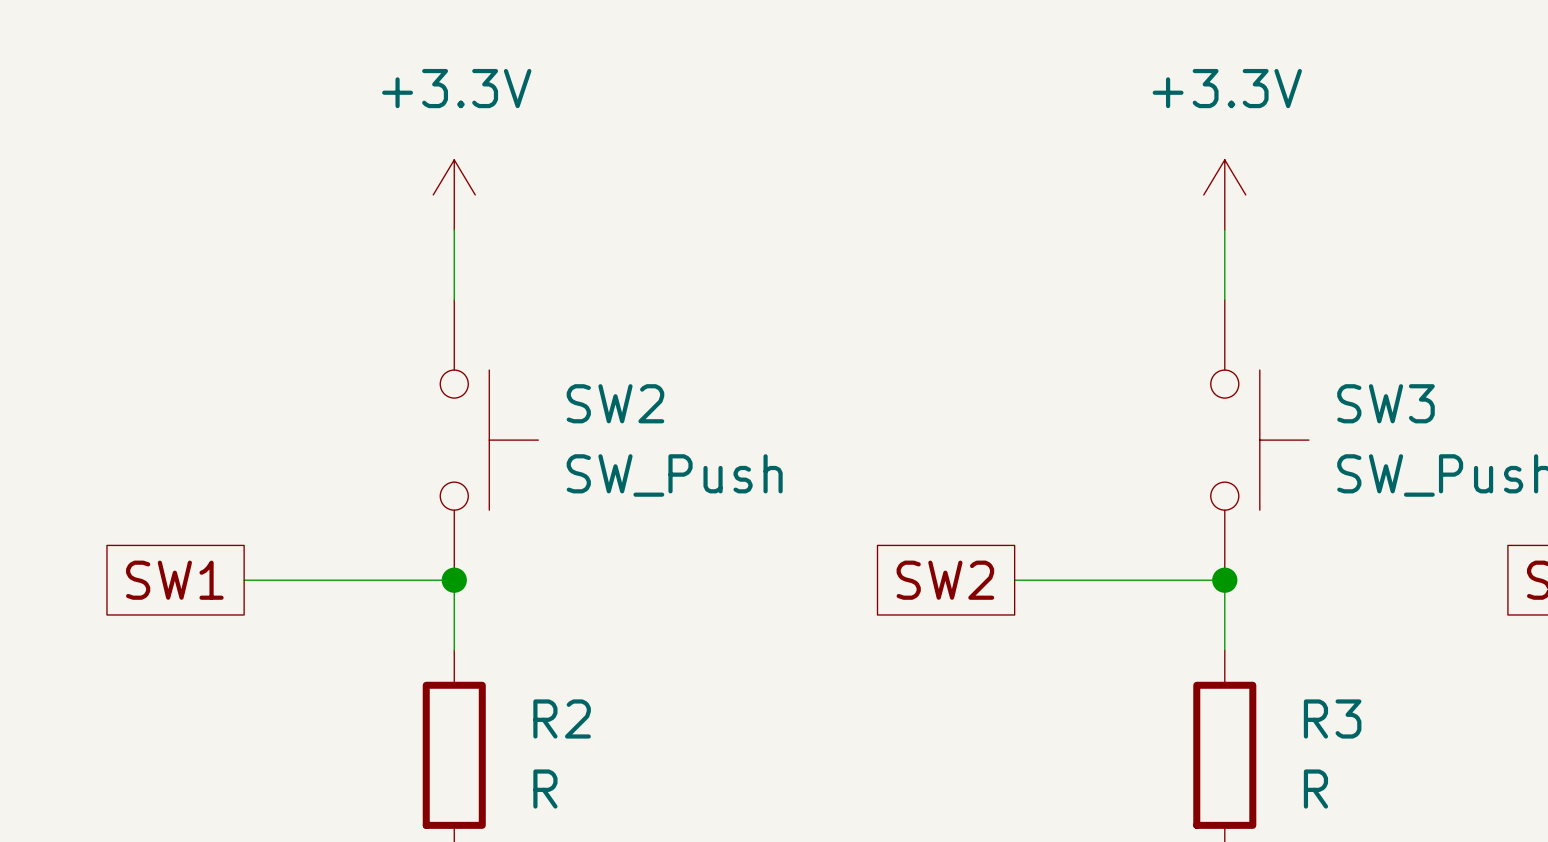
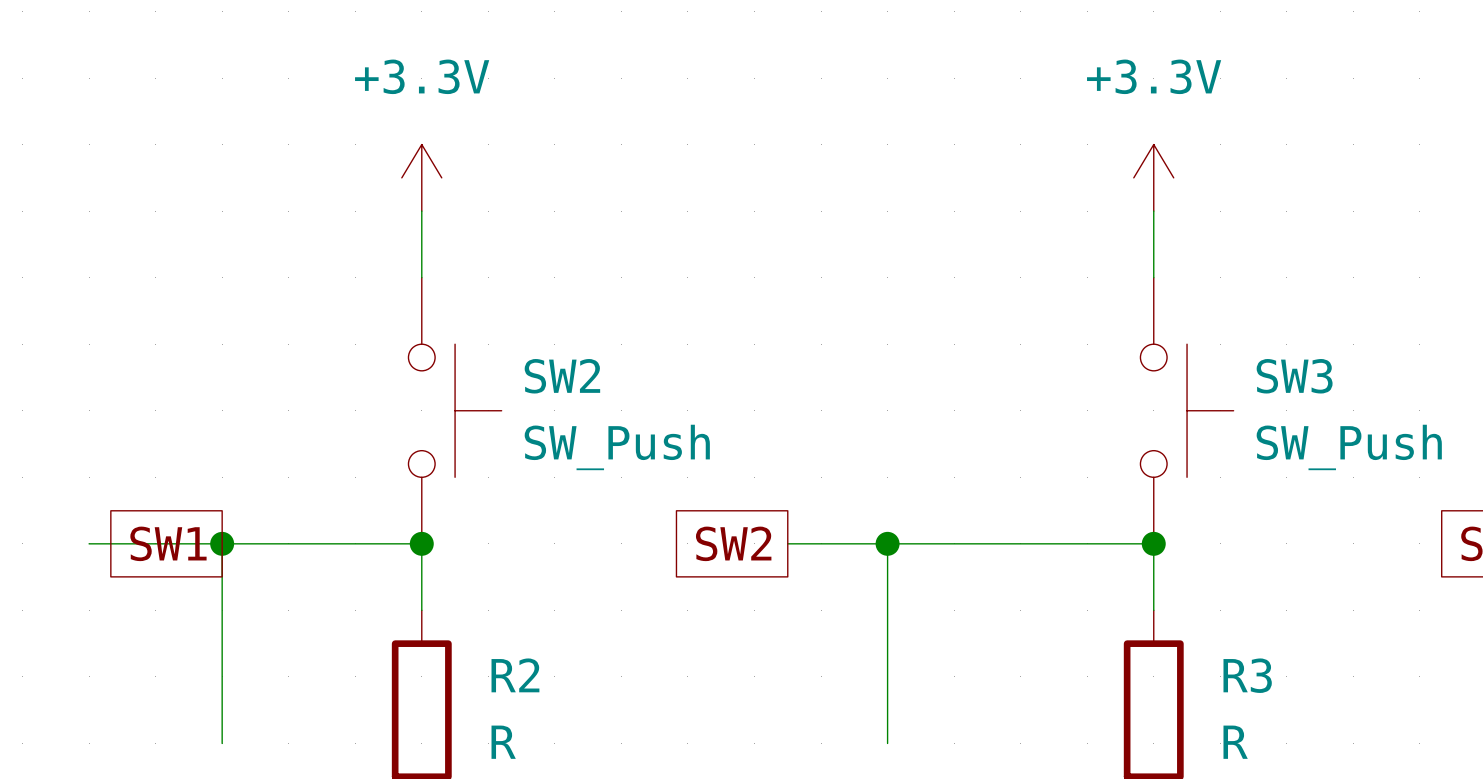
wire: none -> (89, 543) (222, 543) (222, 743)
junction: none -> (222, 543)
wire: none -> (787, 543) (954, 543)
wire: none -> (887, 543) (887, 743)
junction: none -> (887, 543)
global label position: SW2 (945, 580) -> SW2 (733, 543)

